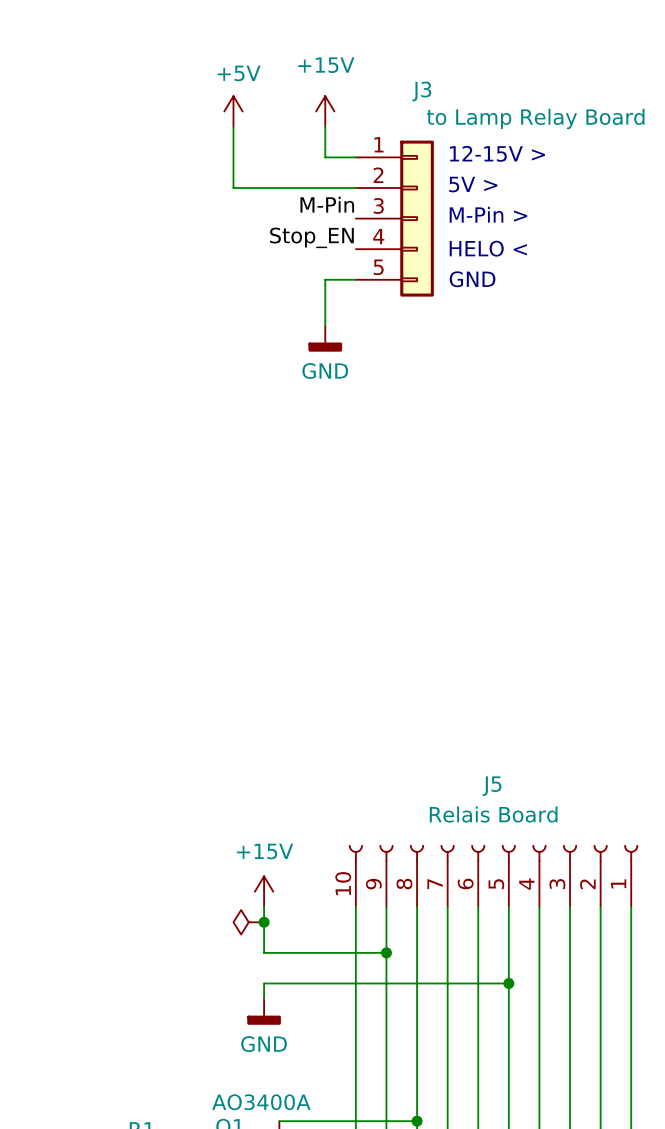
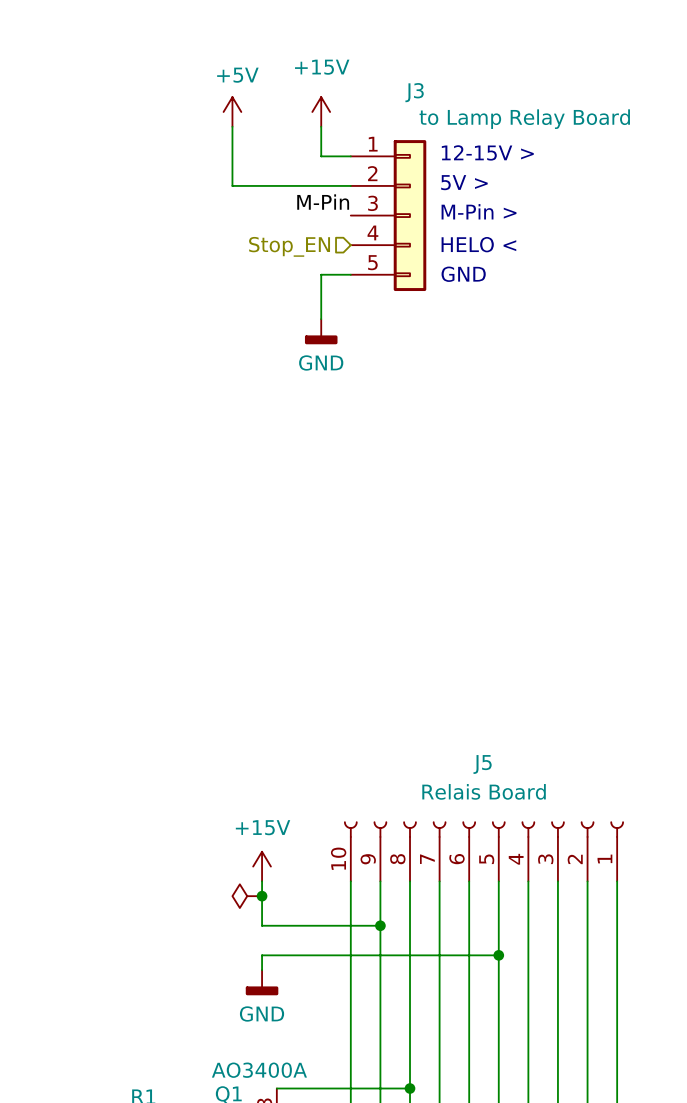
label: Stop_EN (311, 237) -> none
hierarchical label: none -> Stop_EN (289, 246)

